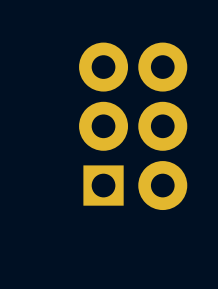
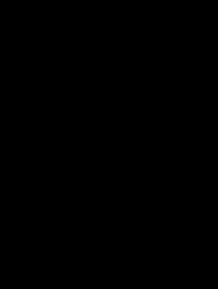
part: (133, 126) -> none

